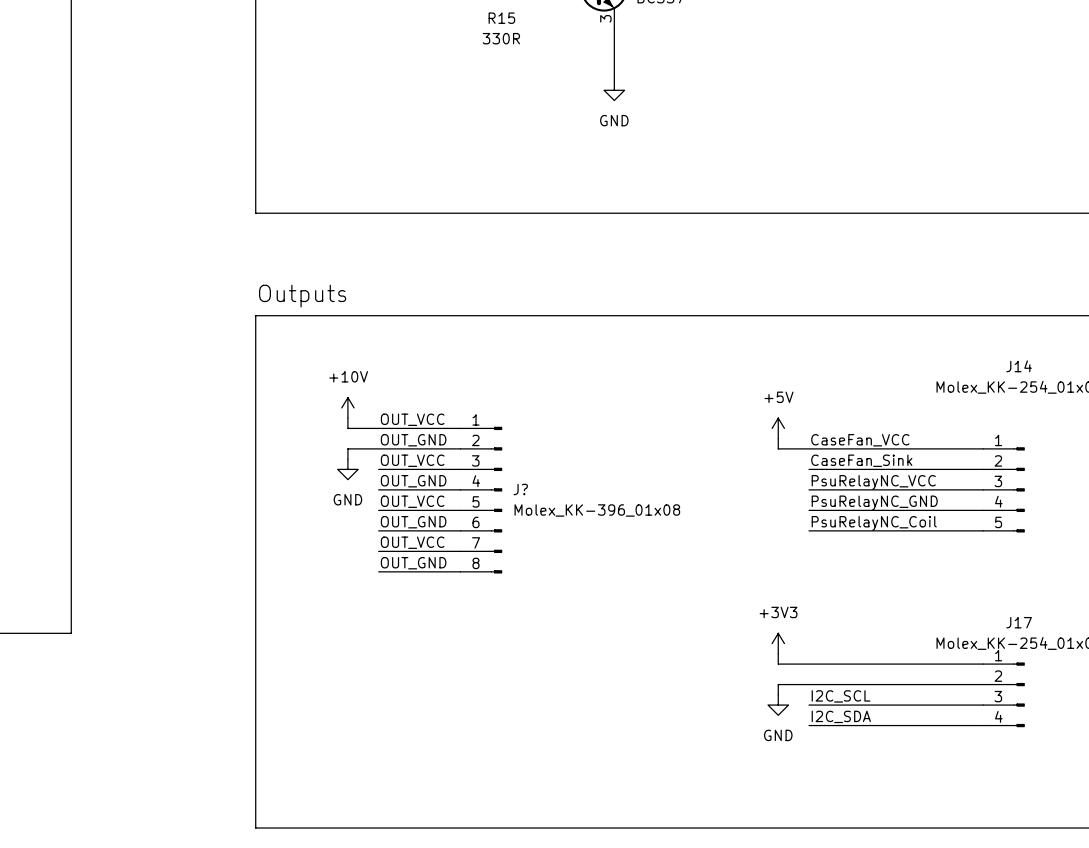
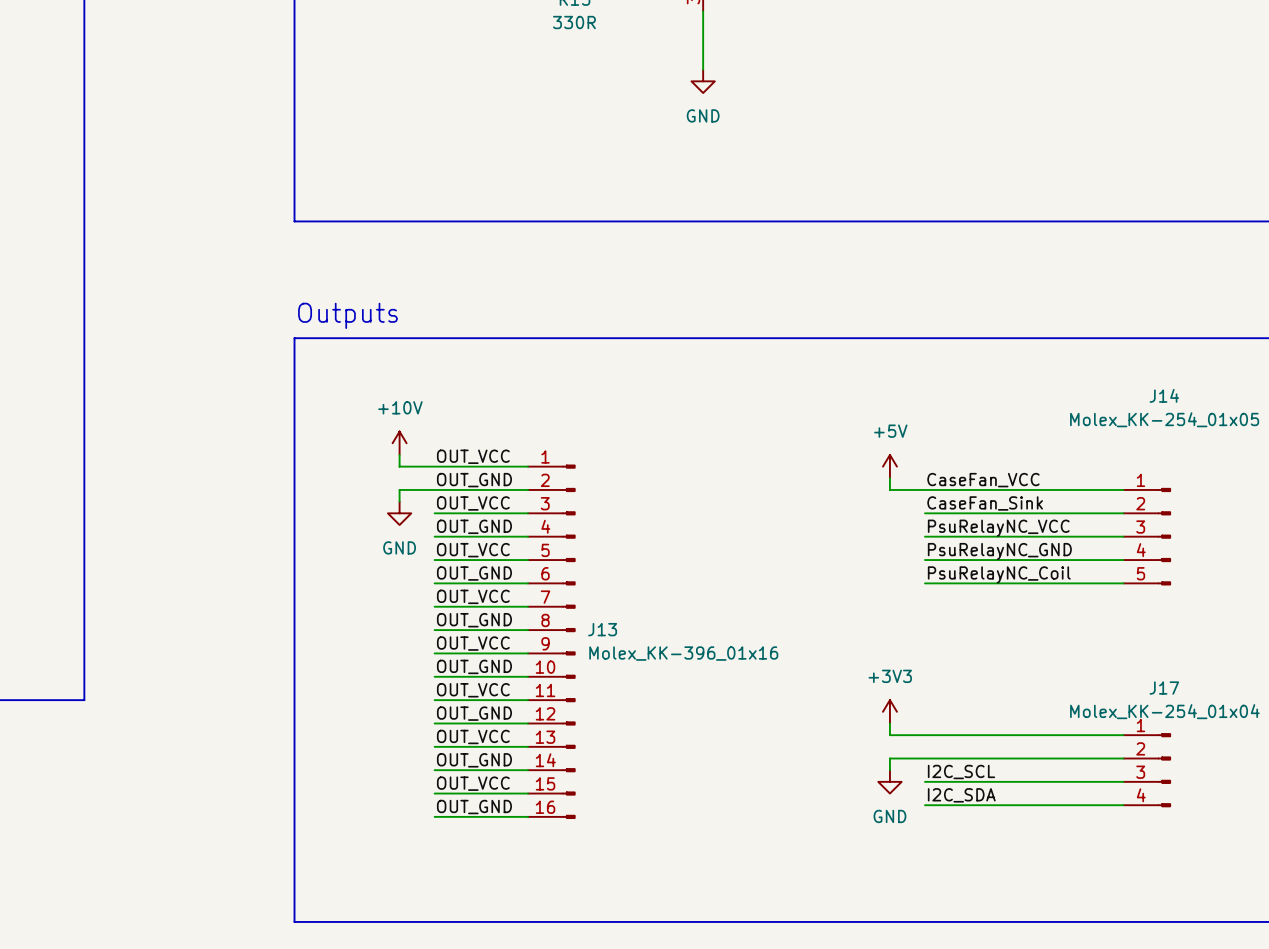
J?: Molex_KK-396_01x08 (481, 500) -> none
J13: none -> Molex_KK-396_01x16 (551, 641)
label: none -> OUT_VCC (473, 643)
wire: none -> (434, 653) (528, 653)
label: none -> OUT_GND (474, 666)
wire: none -> (434, 676) (528, 676)
label: none -> OUT_VCC (473, 690)
wire: none -> (434, 700) (528, 700)
label: none -> OUT_GND (474, 713)
wire: none -> (434, 723) (528, 723)
label: none -> OUT_VCC (473, 736)
wire: none -> (434, 746) (528, 746)
label: none -> OUT_GND (474, 760)
wire: none -> (434, 770) (528, 770)
label: none -> OUT_VCC (473, 783)
wire: none -> (434, 793) (528, 793)
label: none -> OUT_GND (474, 807)
wire: none -> (434, 816) (528, 816)

